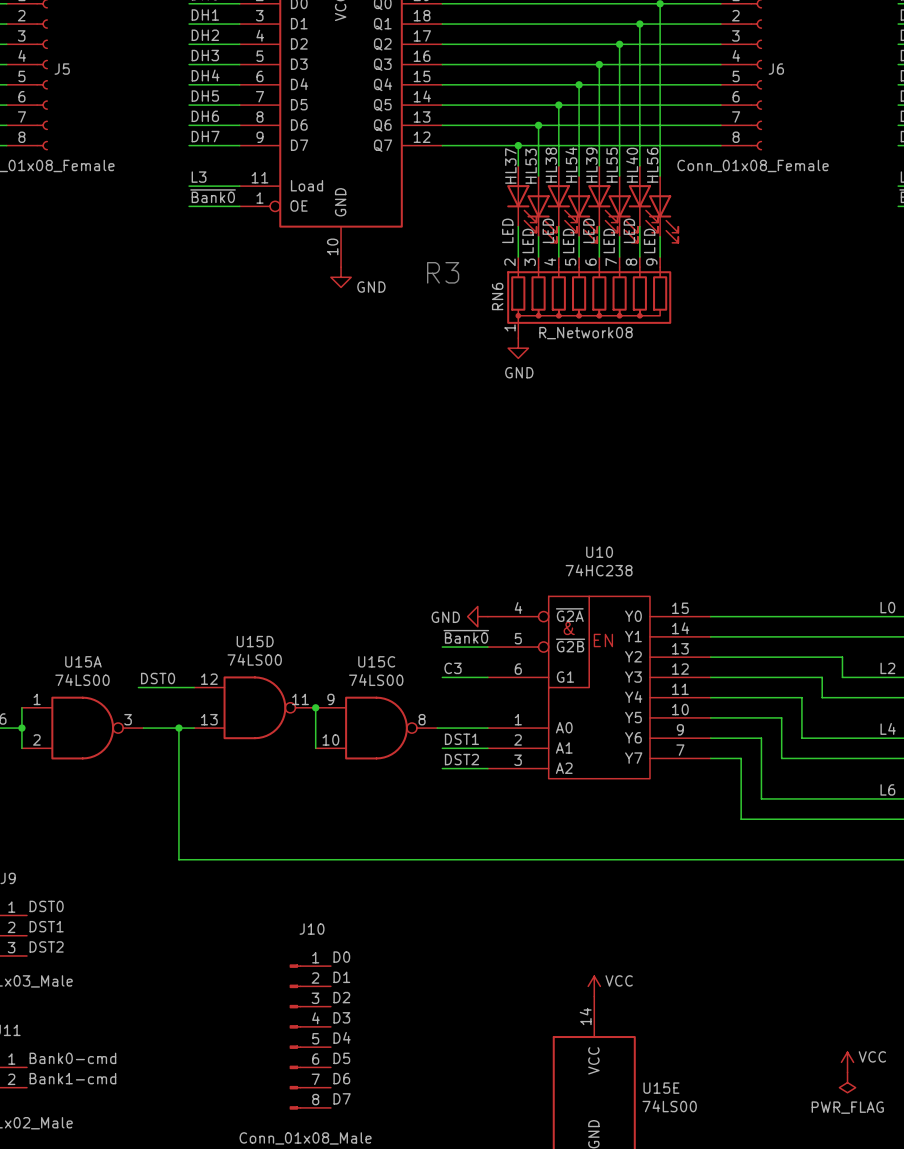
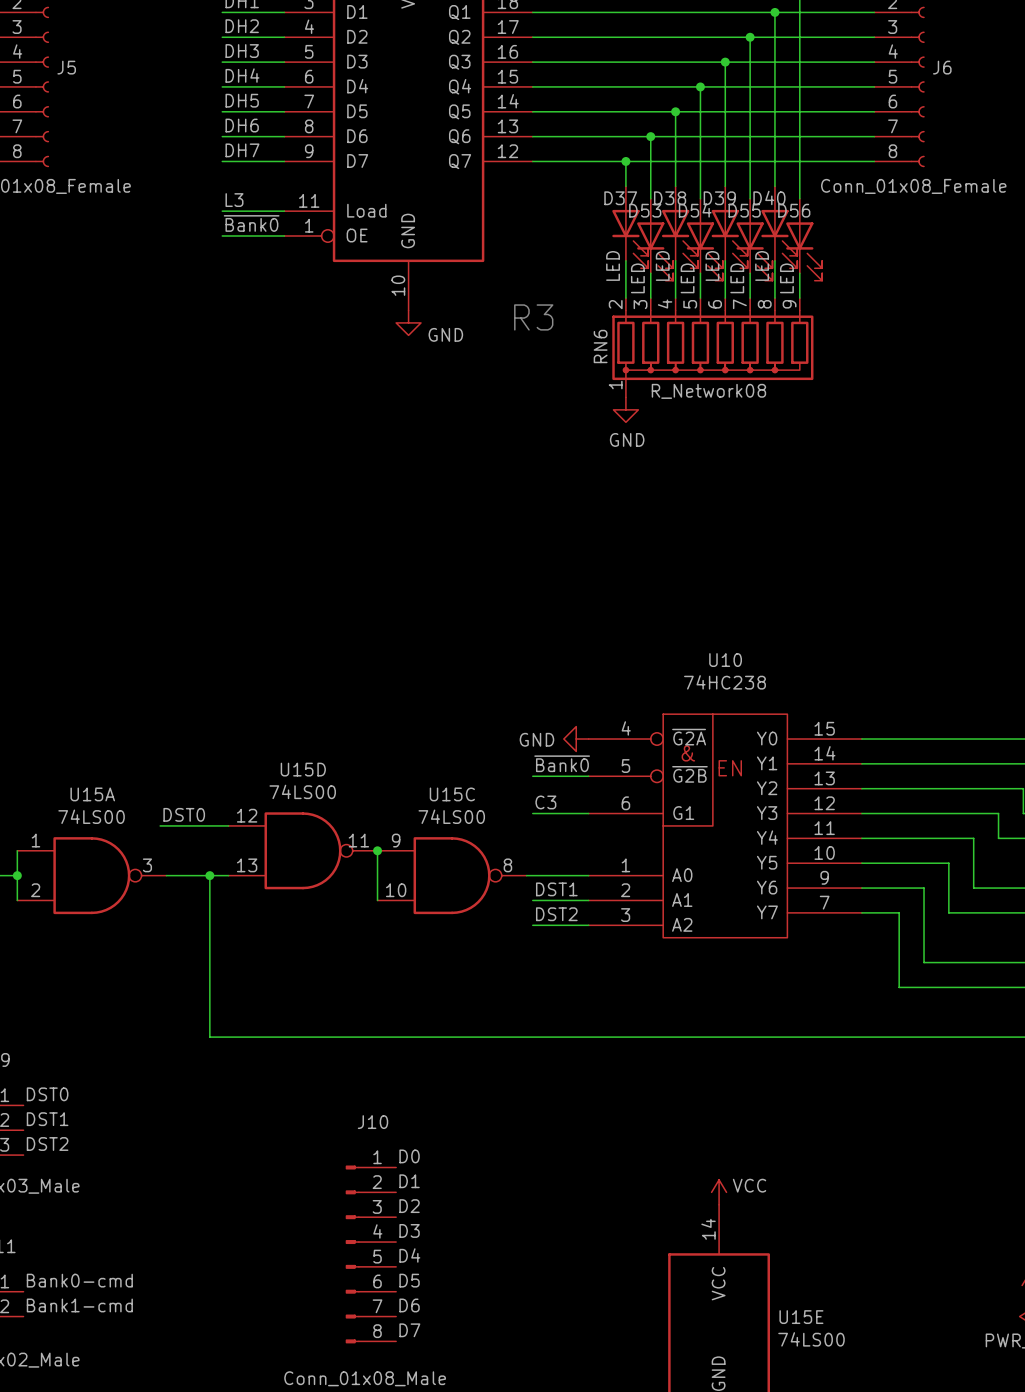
HL54 name: HL54 (571, 164) -> D54 (695, 210)
HL37 name: HL37 (510, 165) -> D37 (620, 198)
HL38 name: HL38 (551, 165) -> D38 (670, 198)
HL39 name: HL39 (591, 165) -> D39 (719, 198)
HL55 name: HL55 (612, 165) -> D55 (744, 210)
HL40 name: HL40 (632, 165) -> D40 (769, 197)
HL56 name: HL56 (652, 165) -> D56 (794, 210)
HL53 name: HL53 (531, 166) -> D53 (645, 210)

